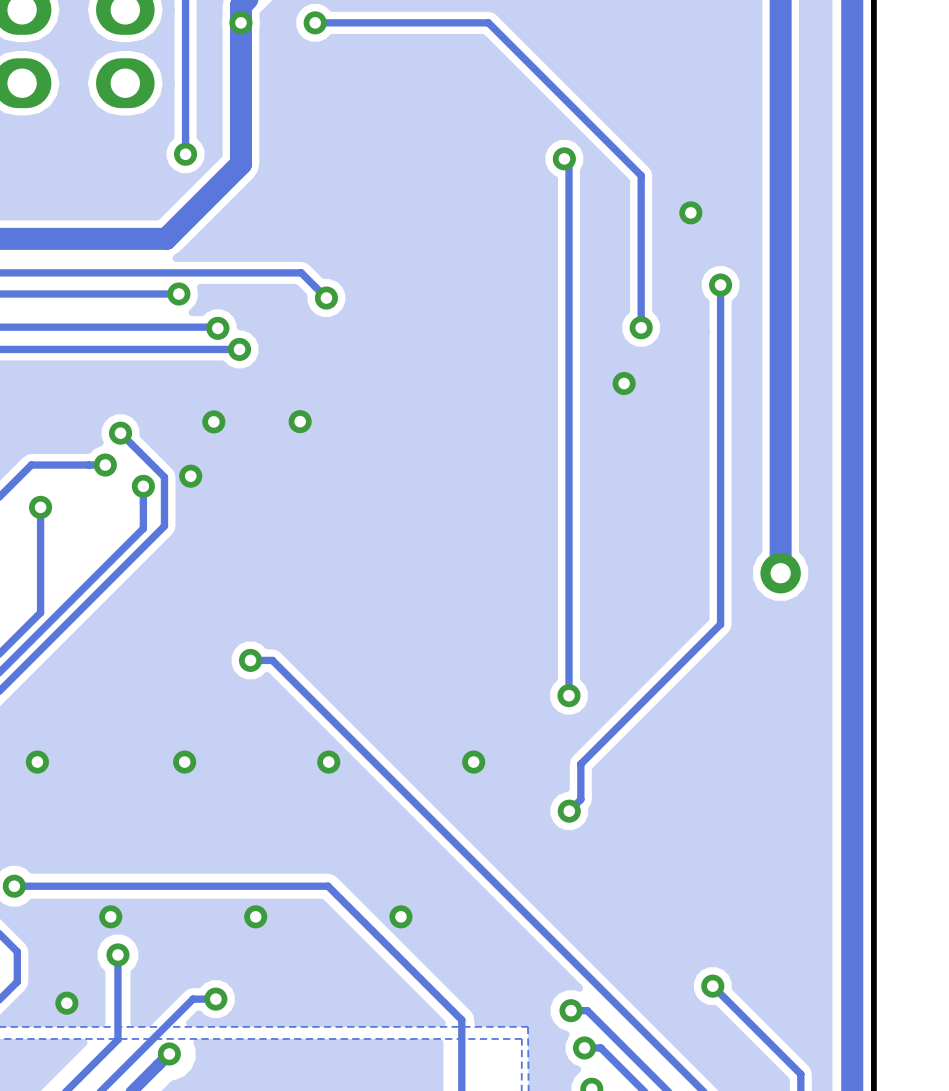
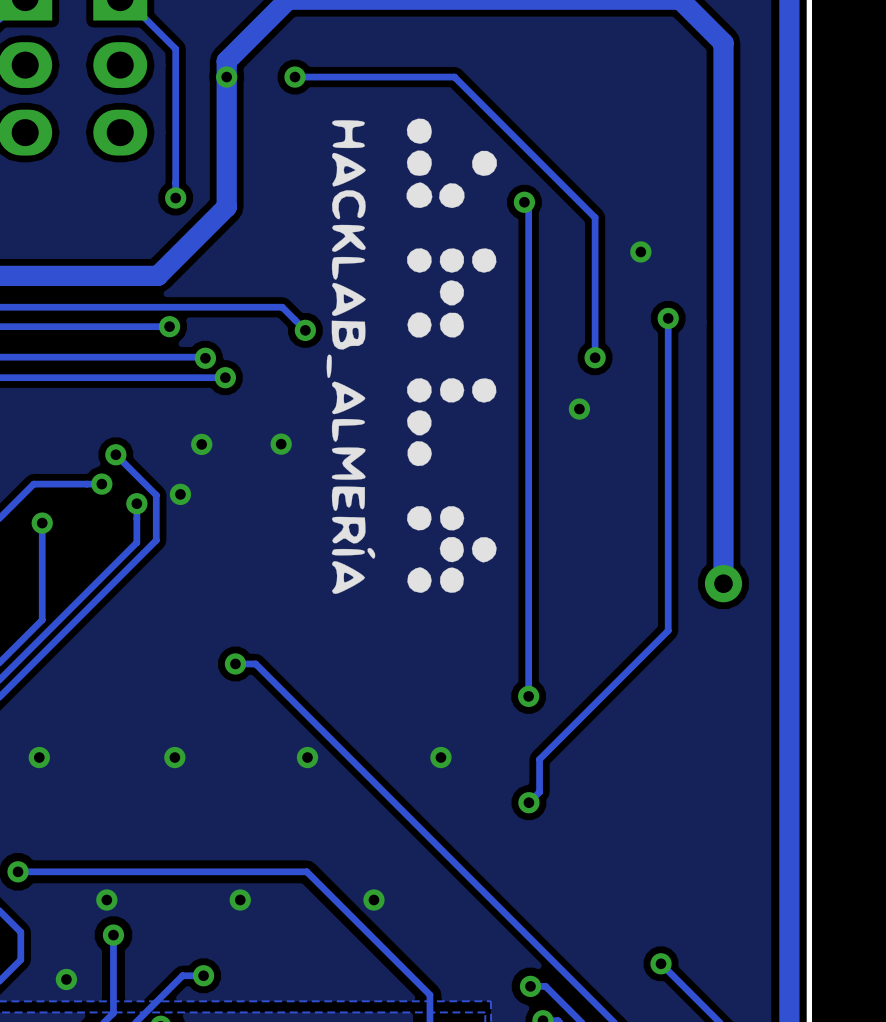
drawing: none -> [326, 118, 497, 594]

